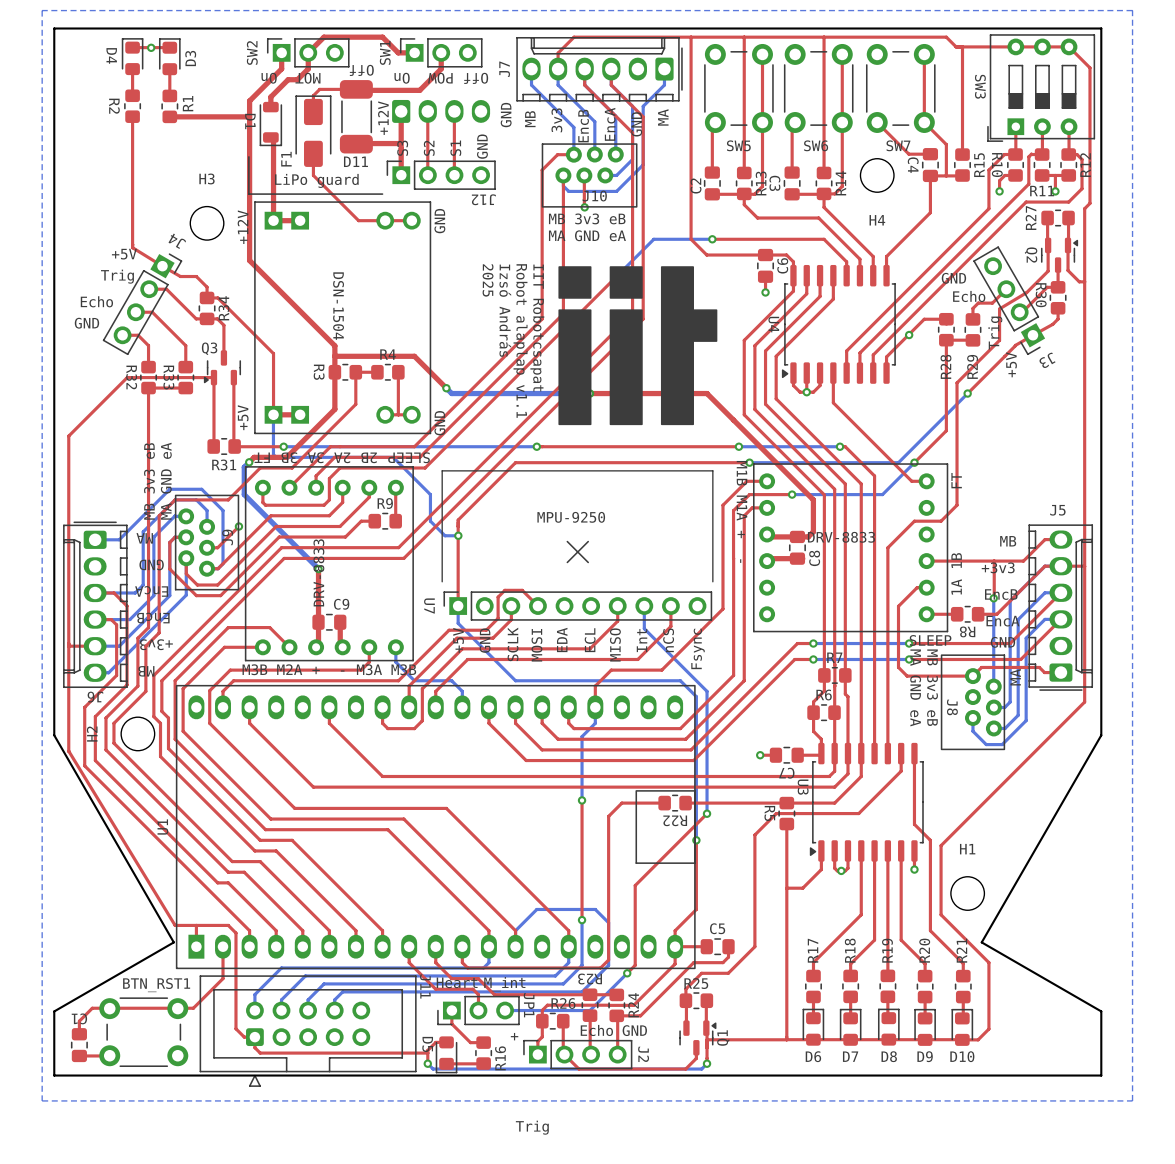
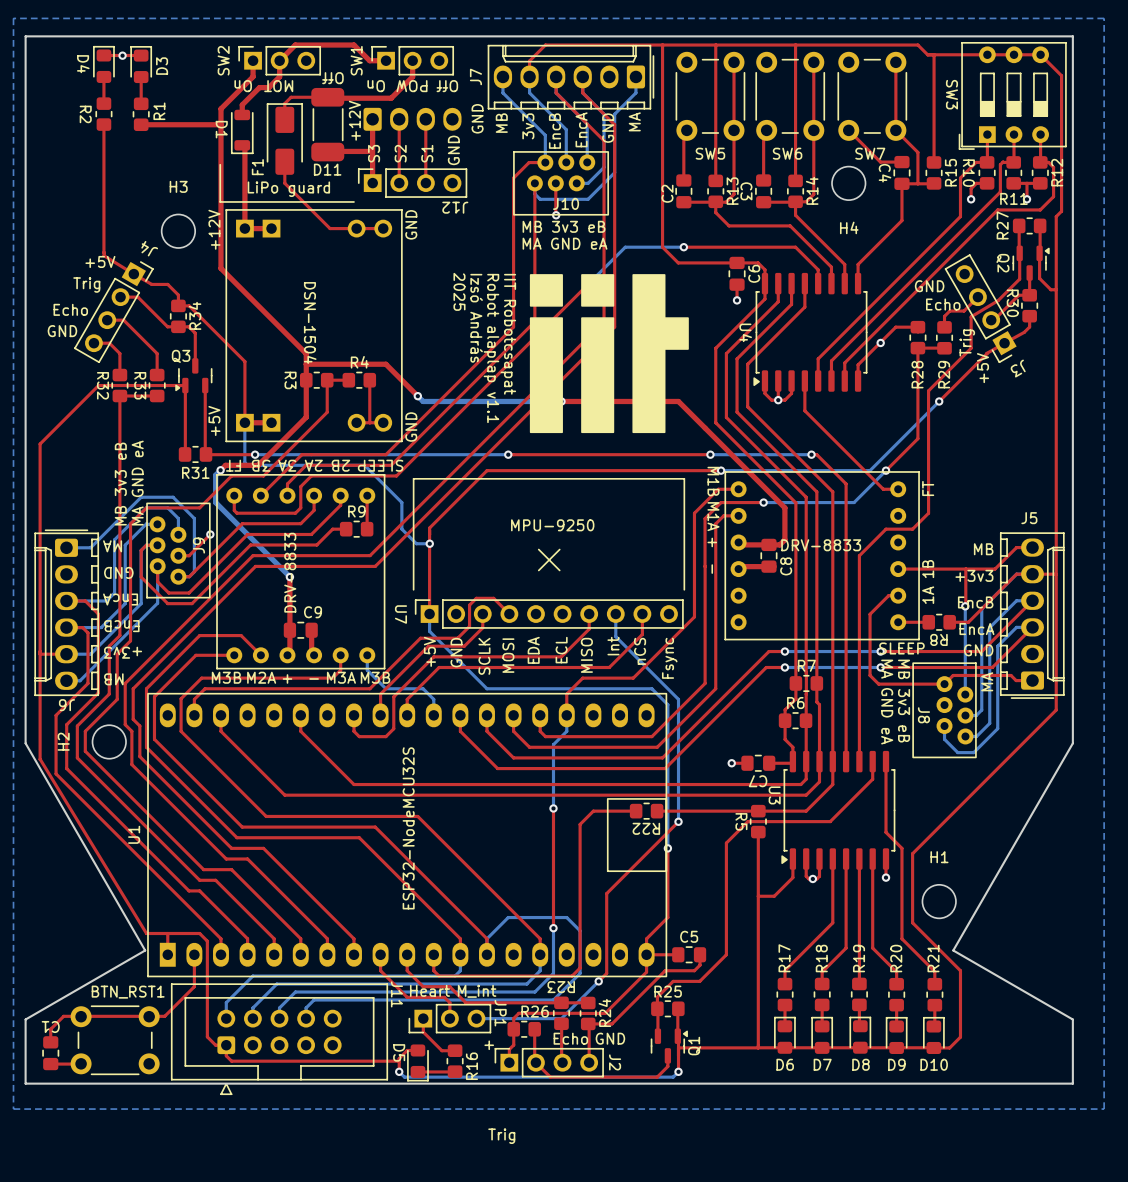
text: none -> ESP32-NodeMCU32S (408, 828)

